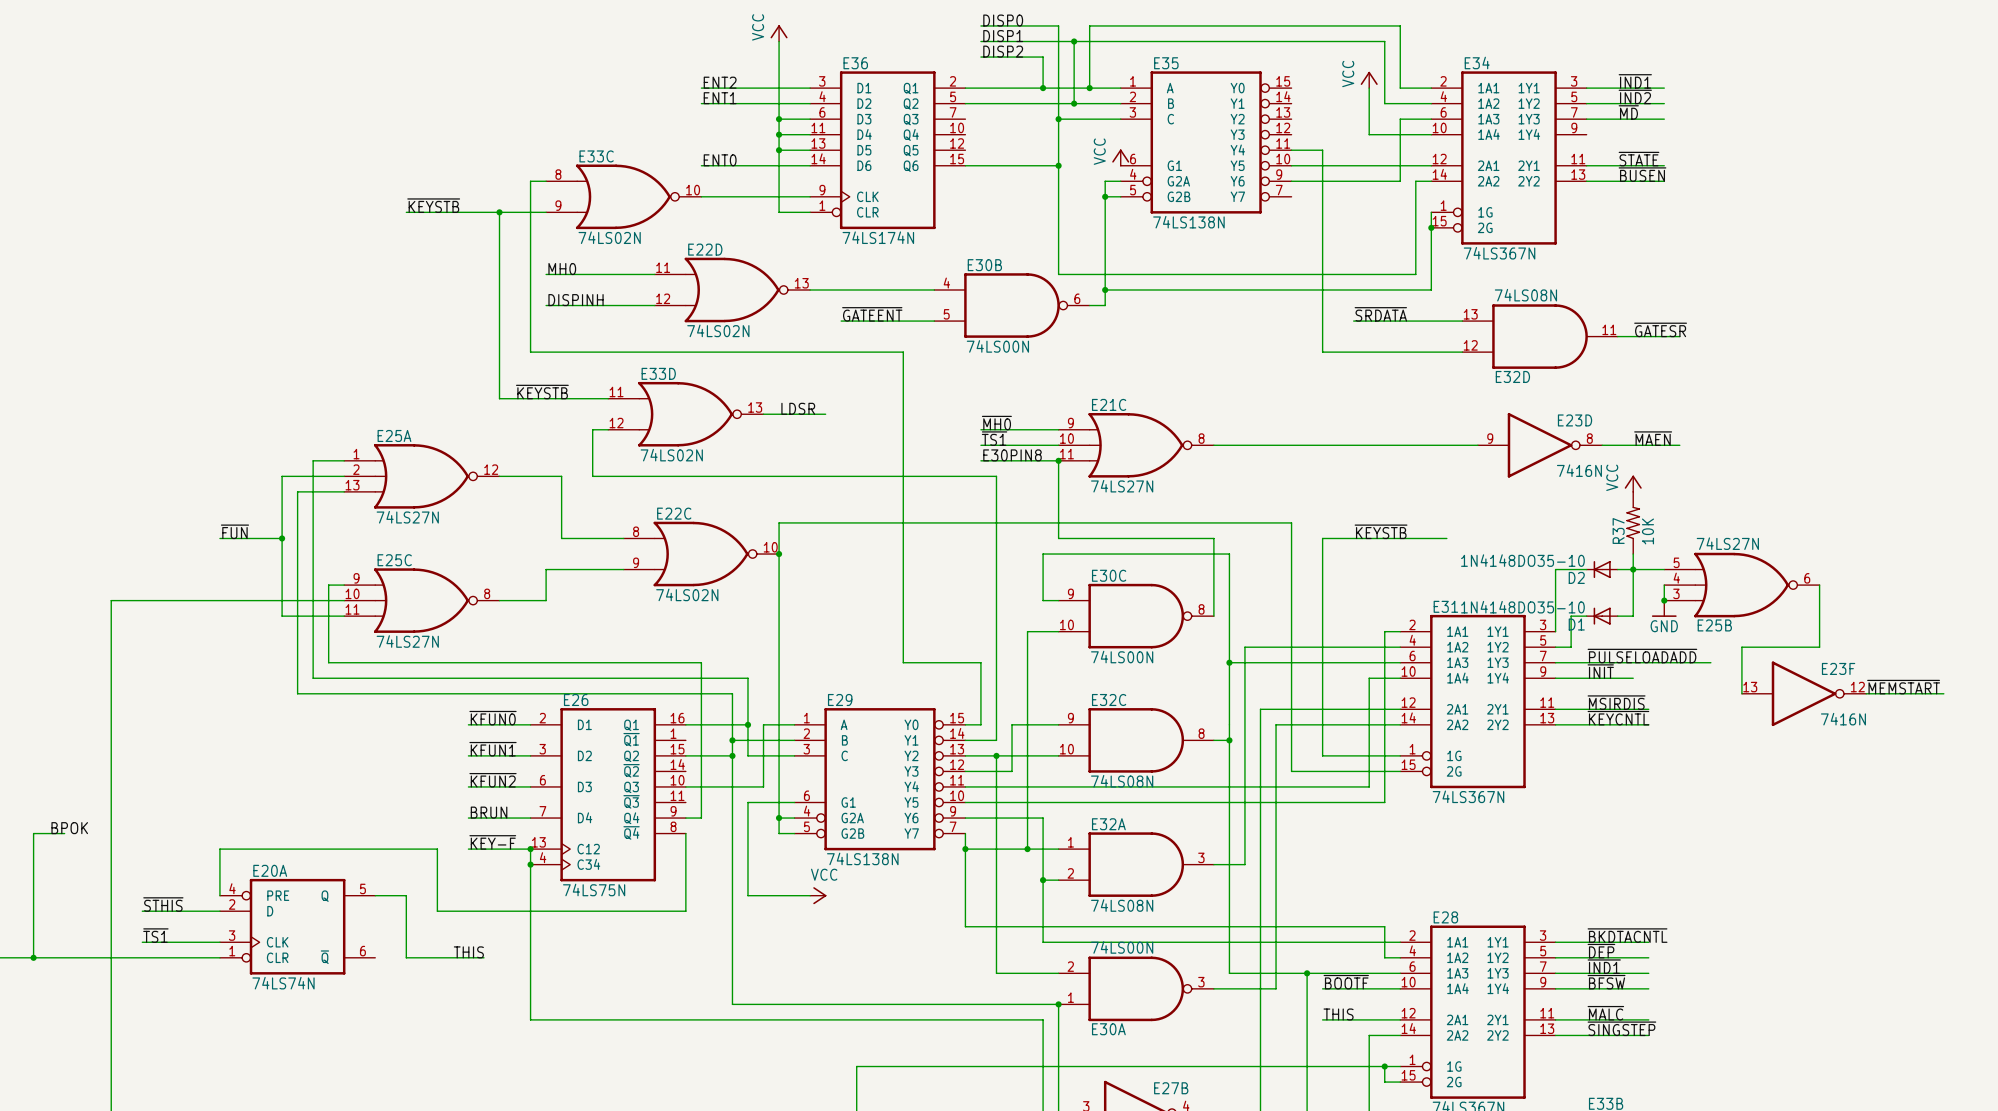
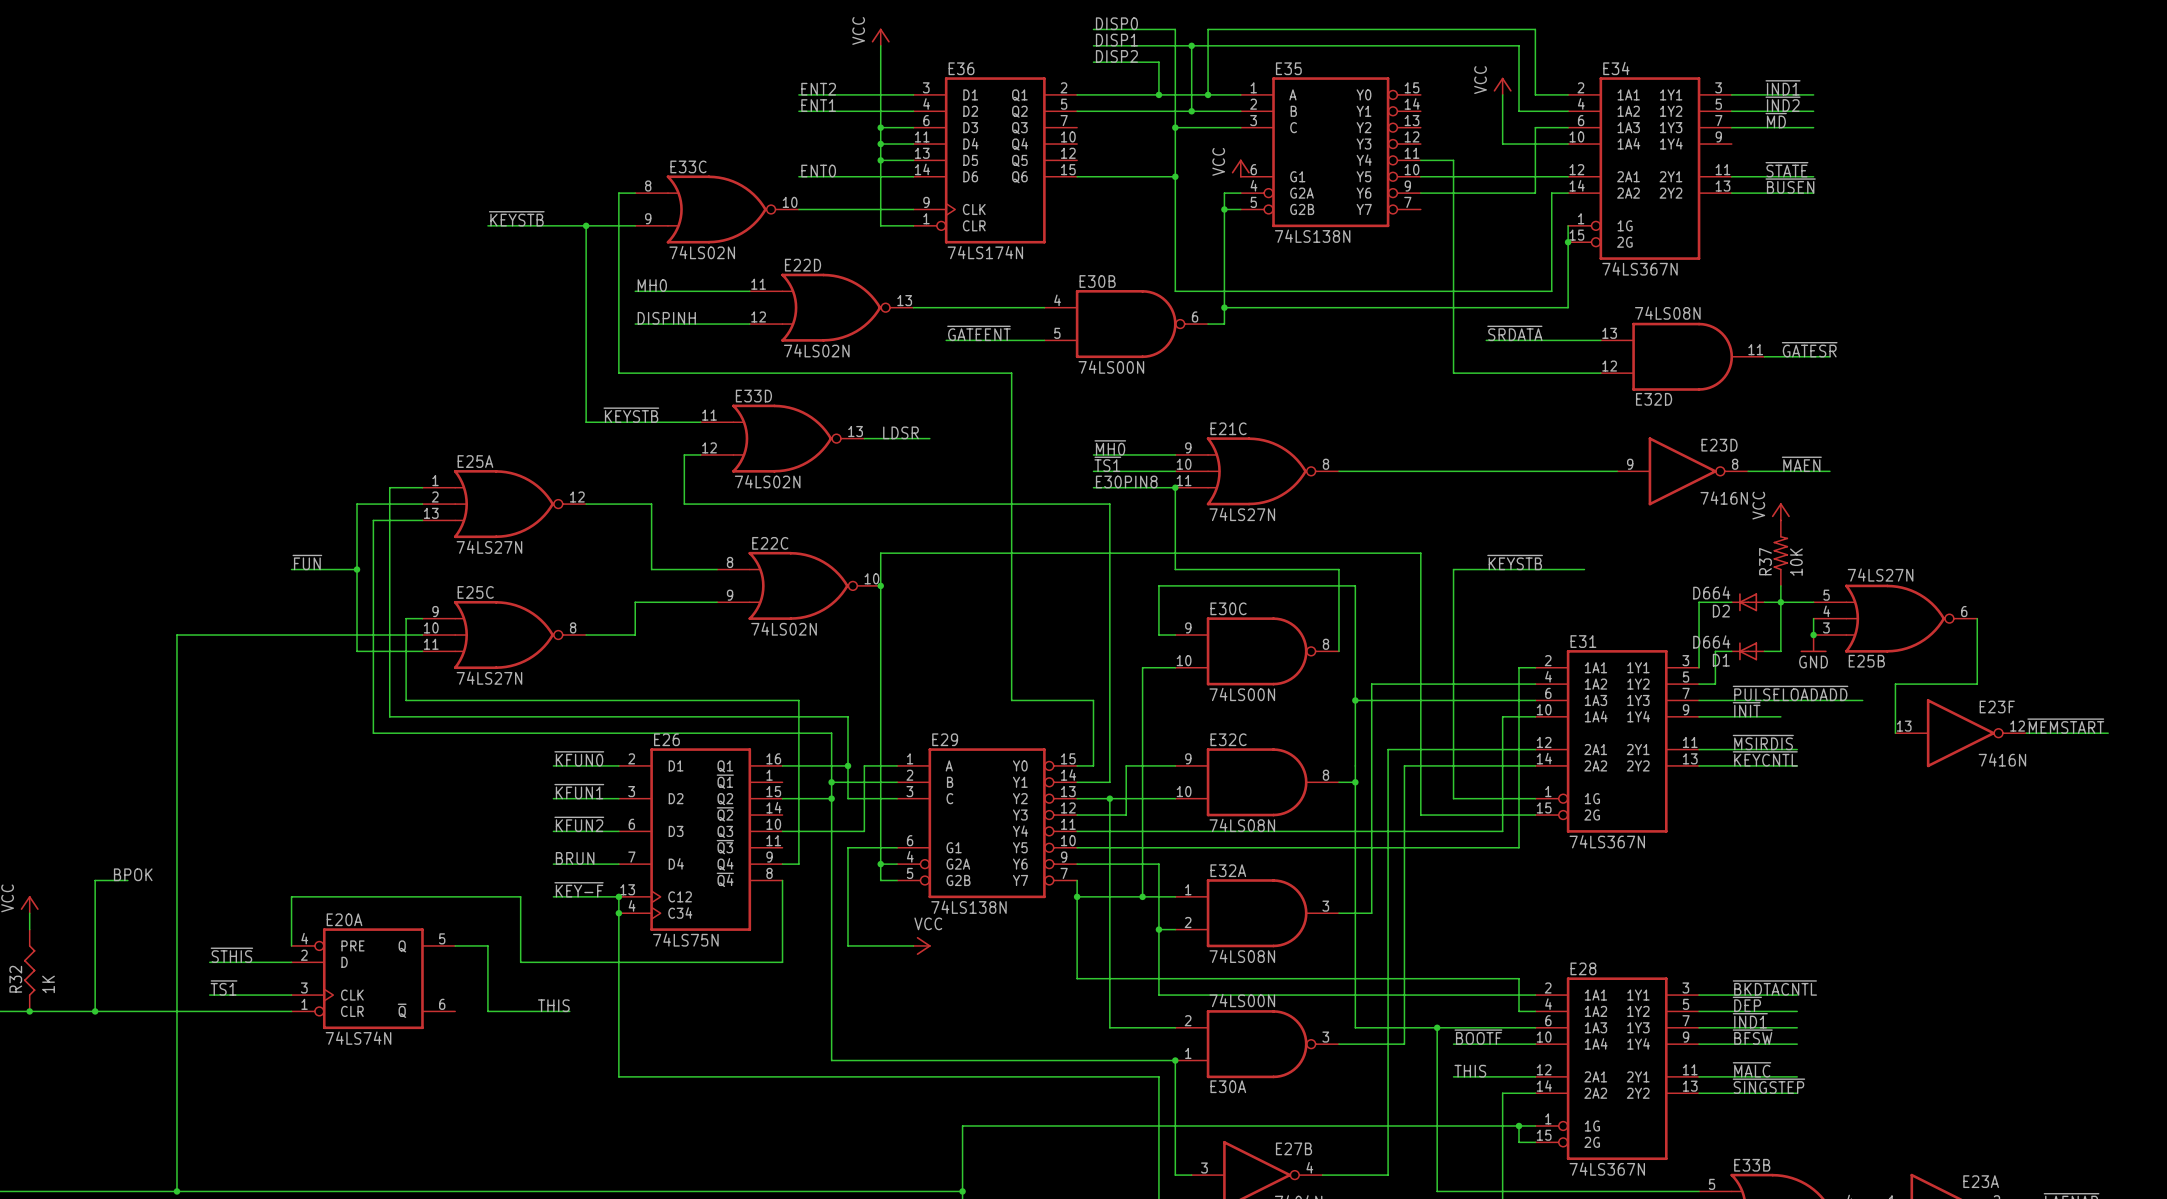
D2 value: 1N4148DO35-10 (1522, 560) -> D664 (1711, 592)
D1 value: 1N4148DO35-10 (1522, 607) -> D664 (1711, 641)

